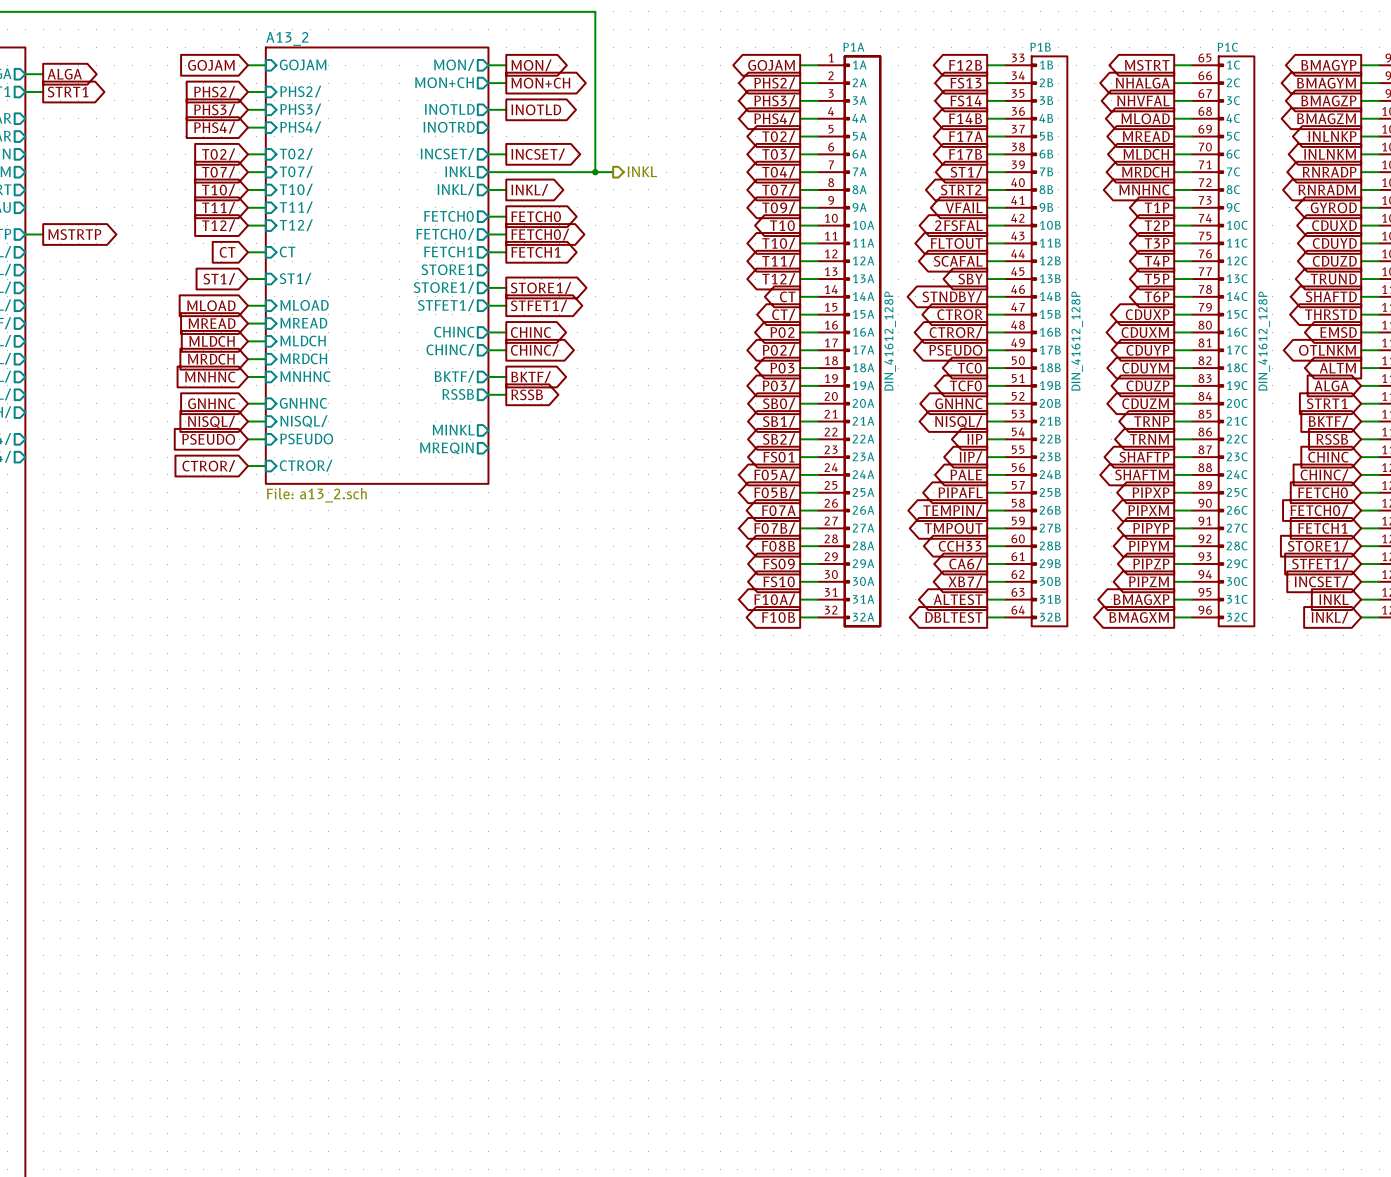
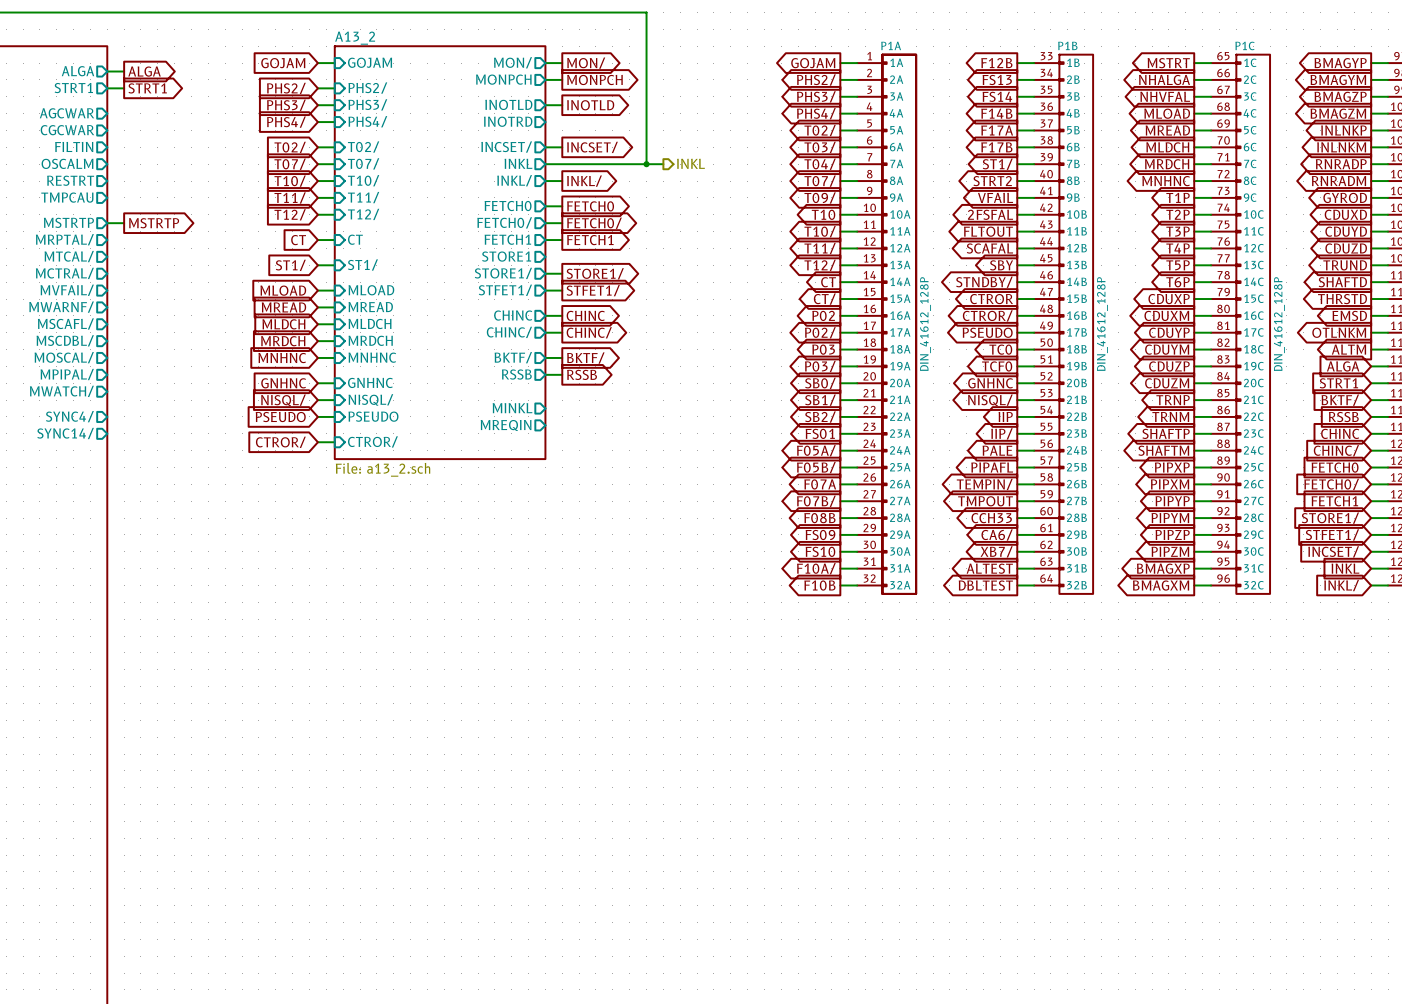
sheet pin: MON+CH (444, 82) -> MONPCH (503, 79)
global label: MON+CH (540, 83) -> MONPCH (594, 79)

